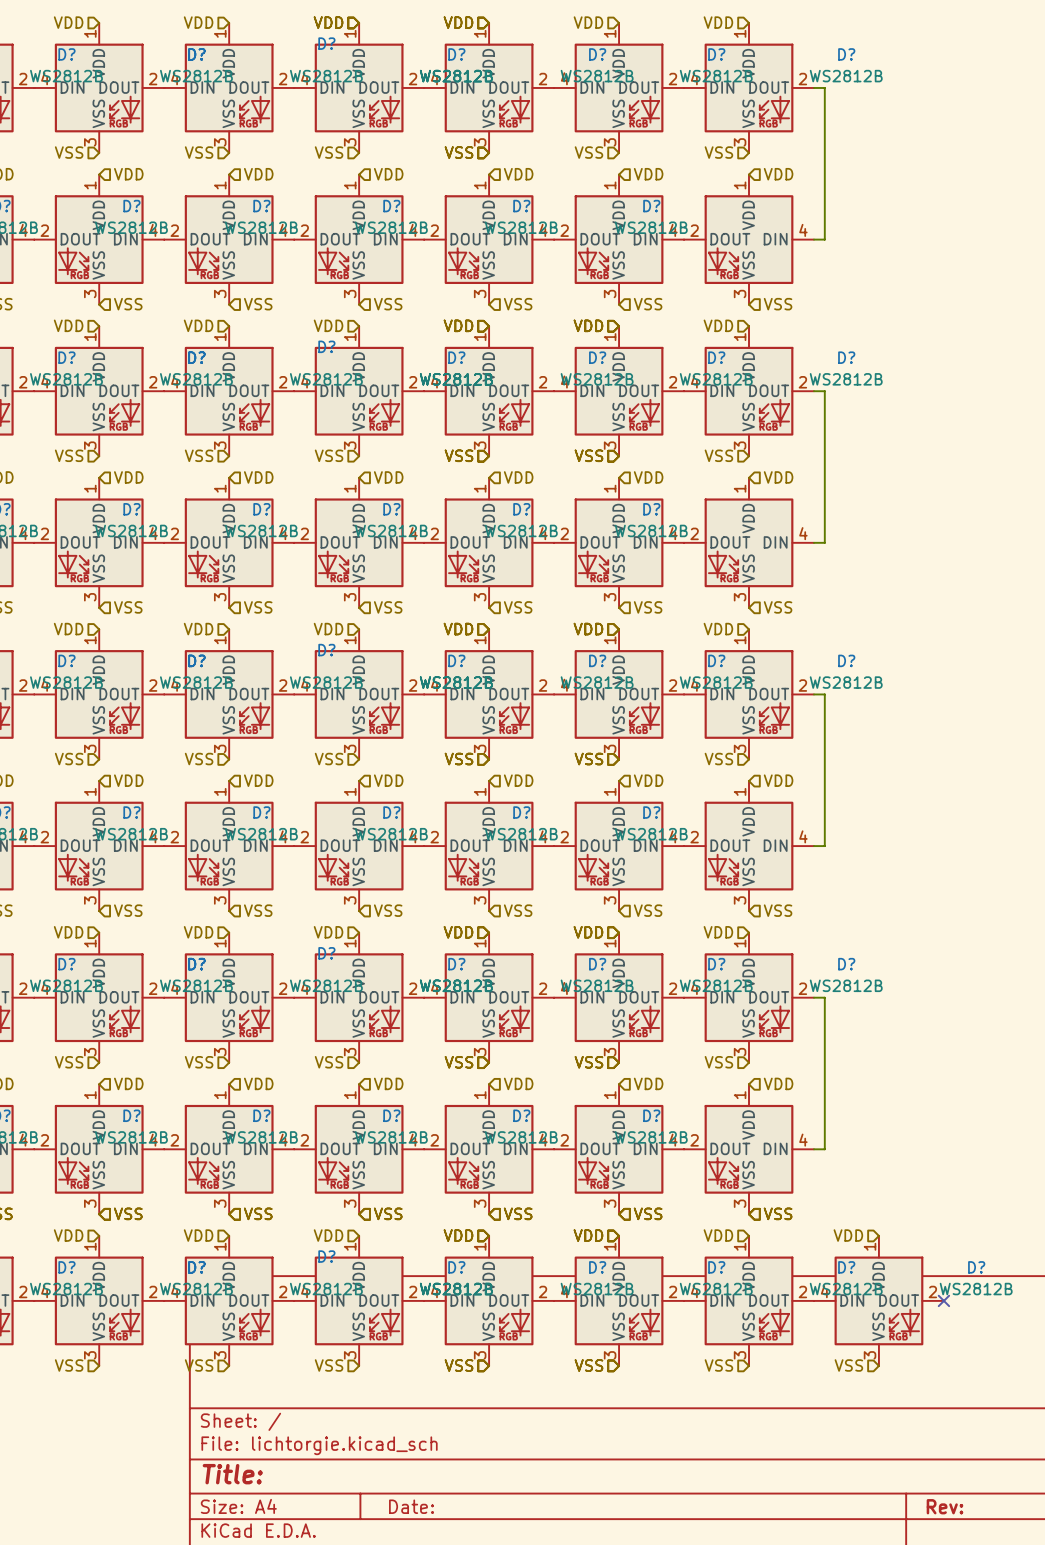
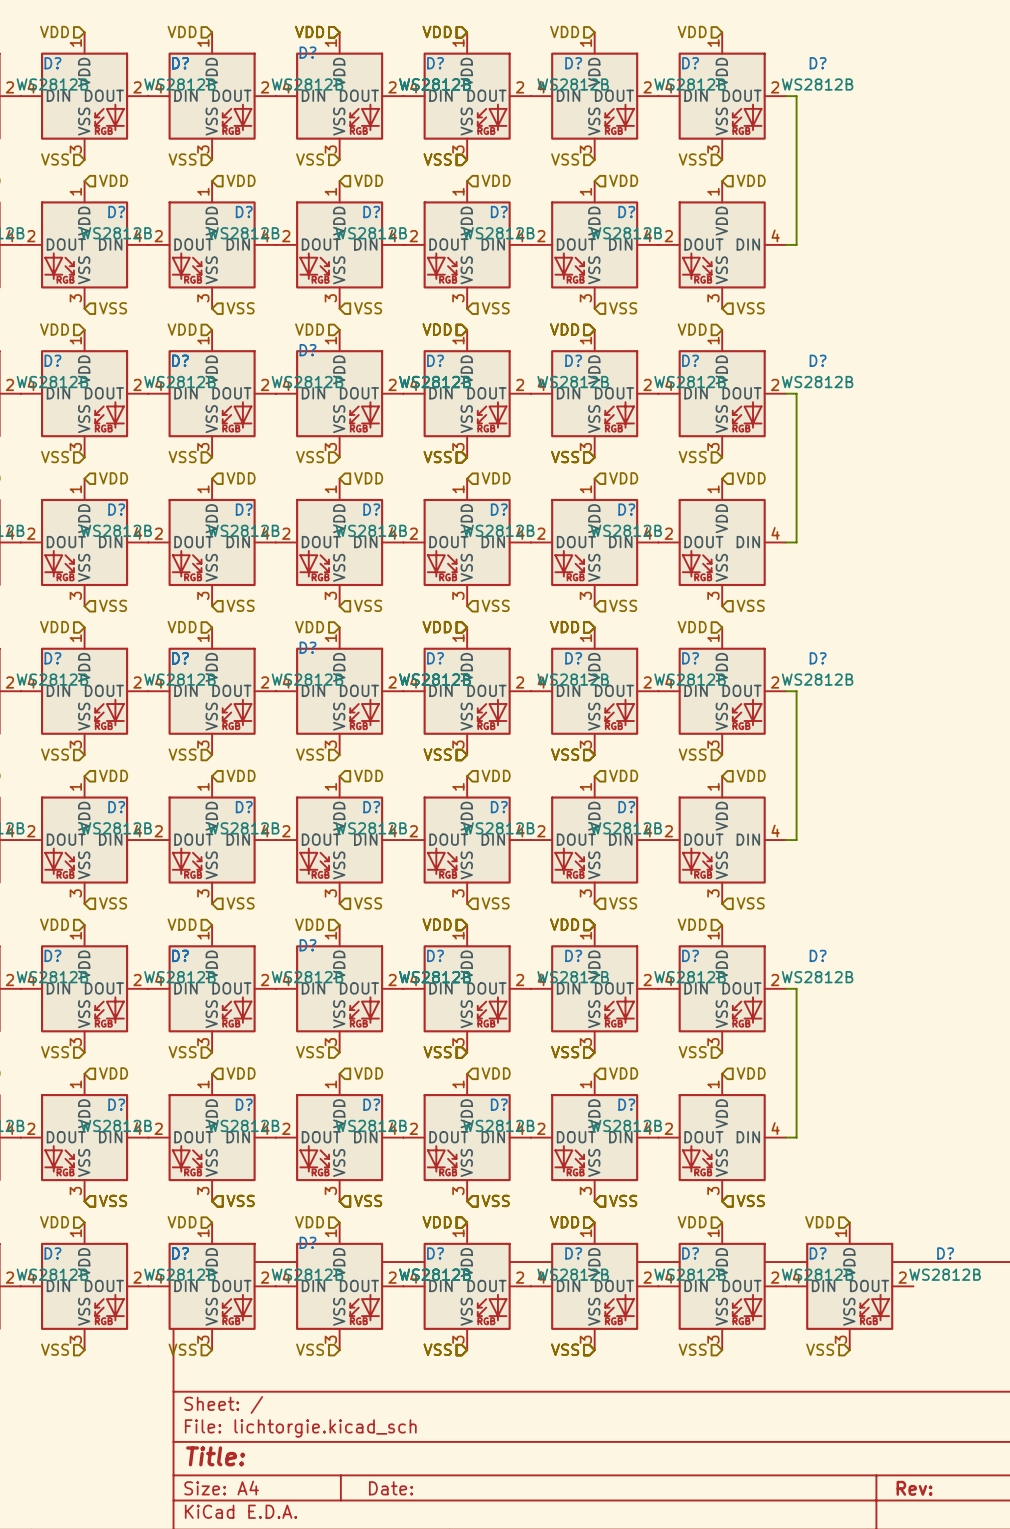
no-connect mark: (943, 1300) -> none

